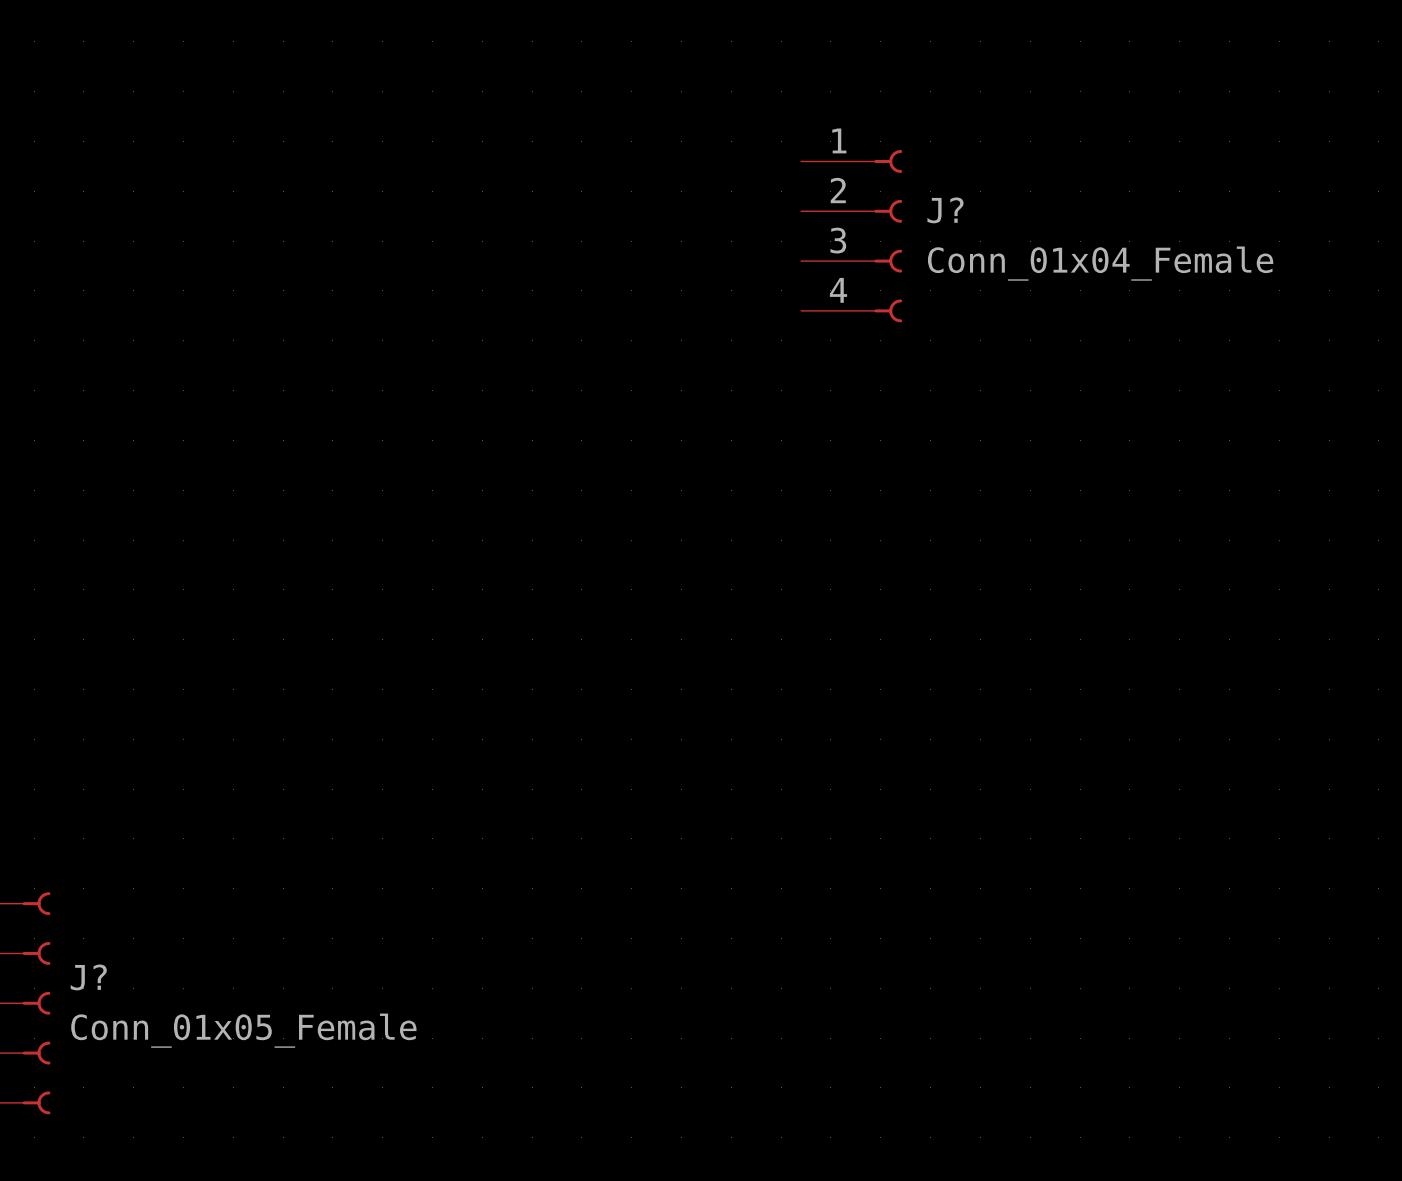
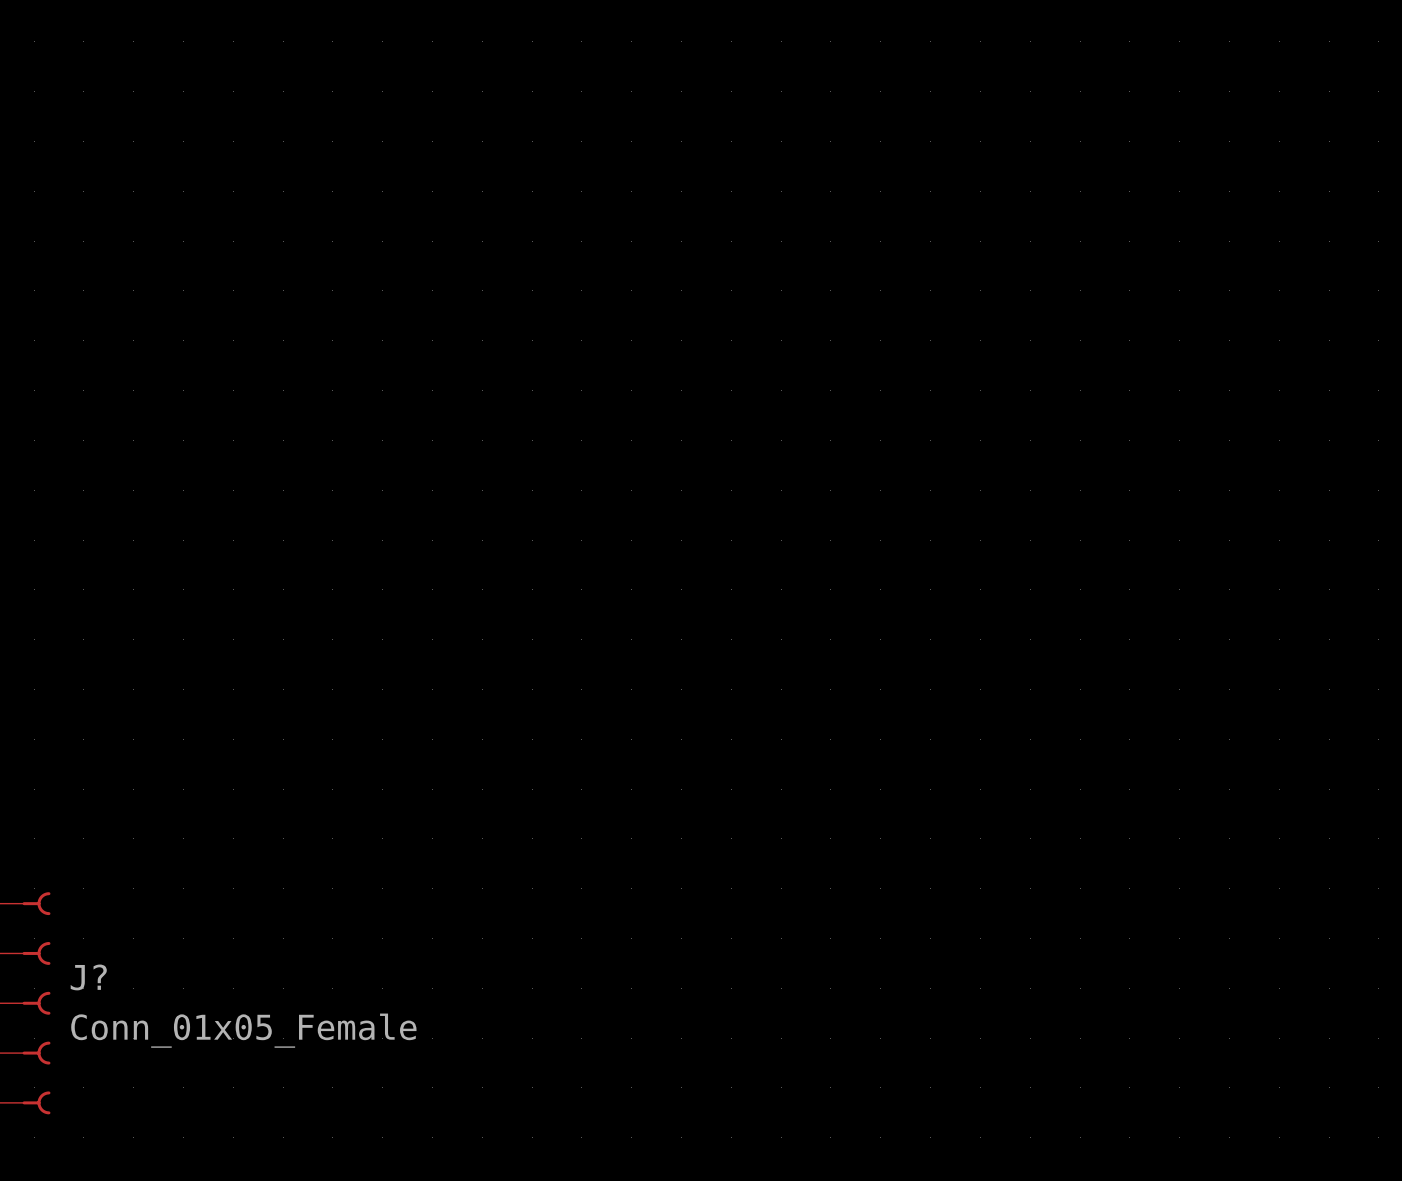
J?: Conn_01x04_Female (851, 236) -> none

